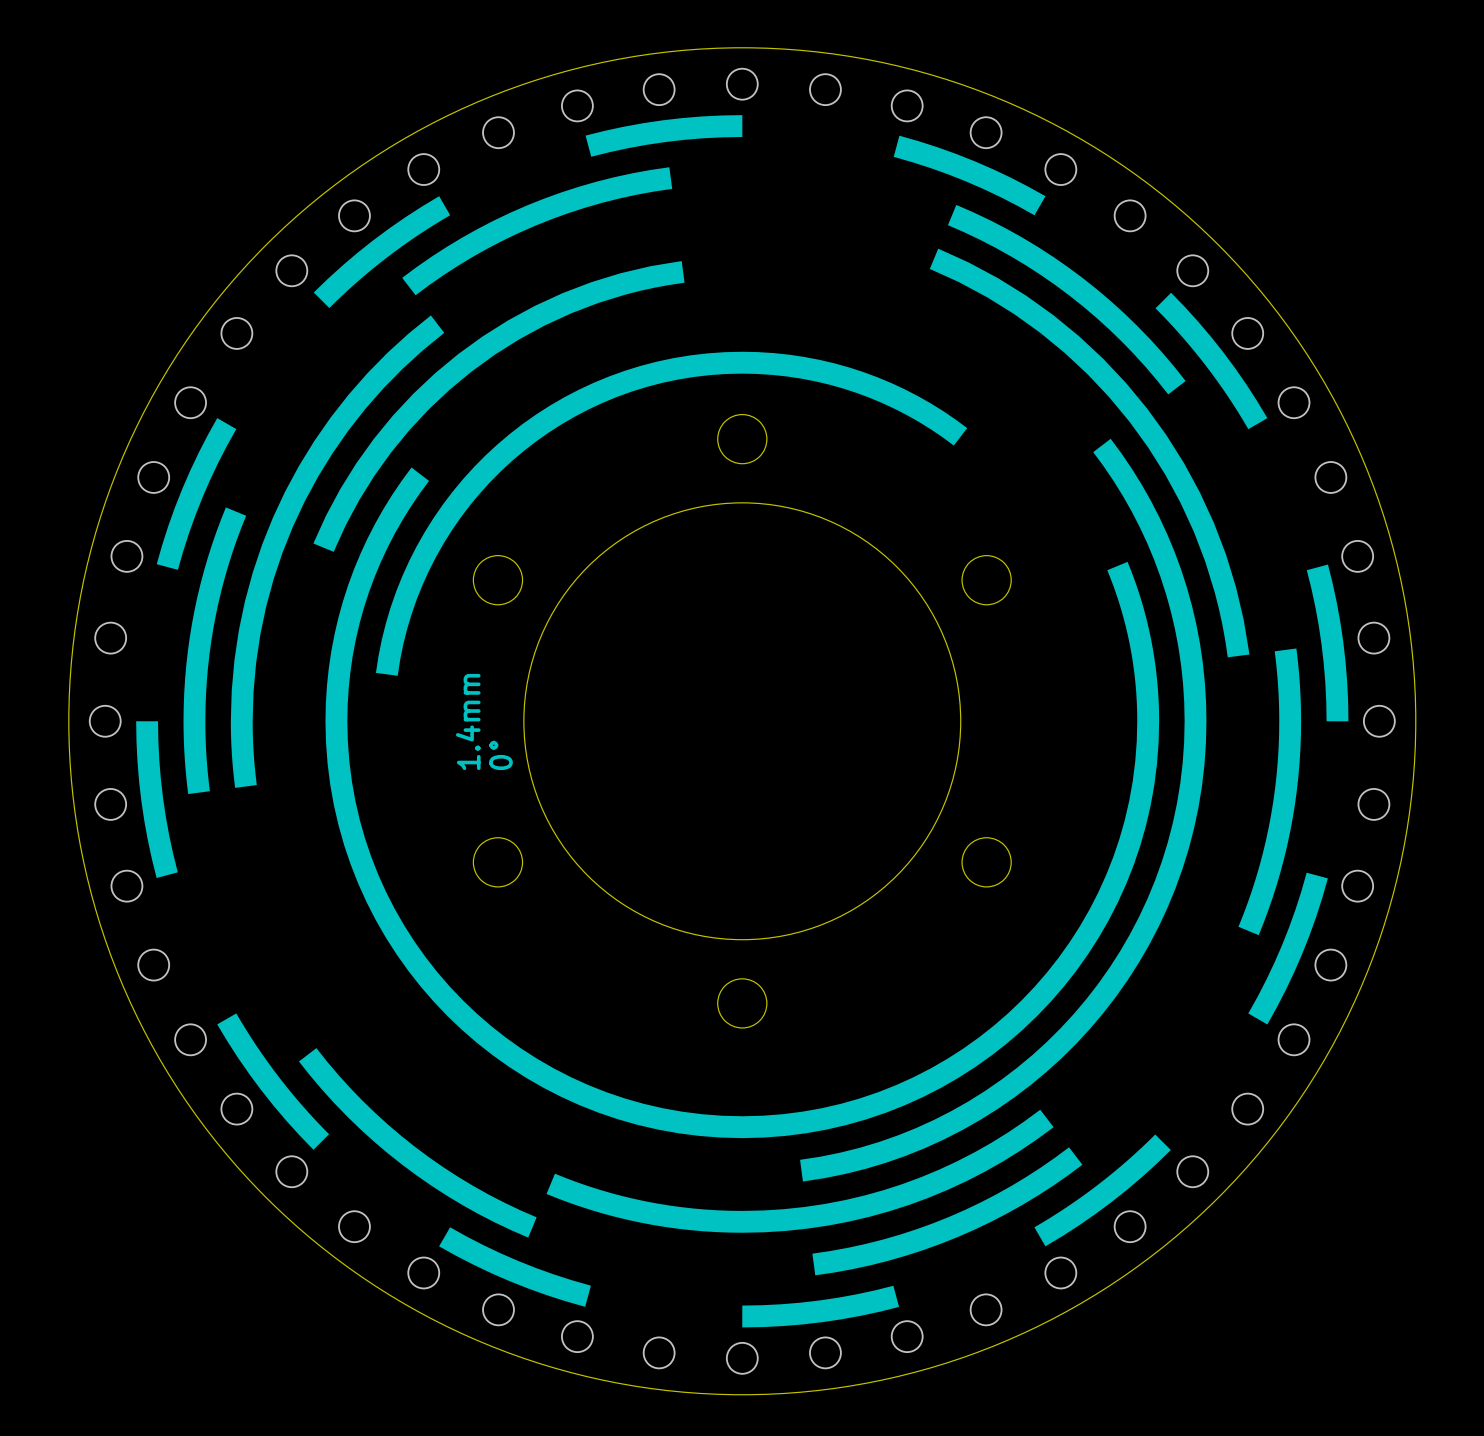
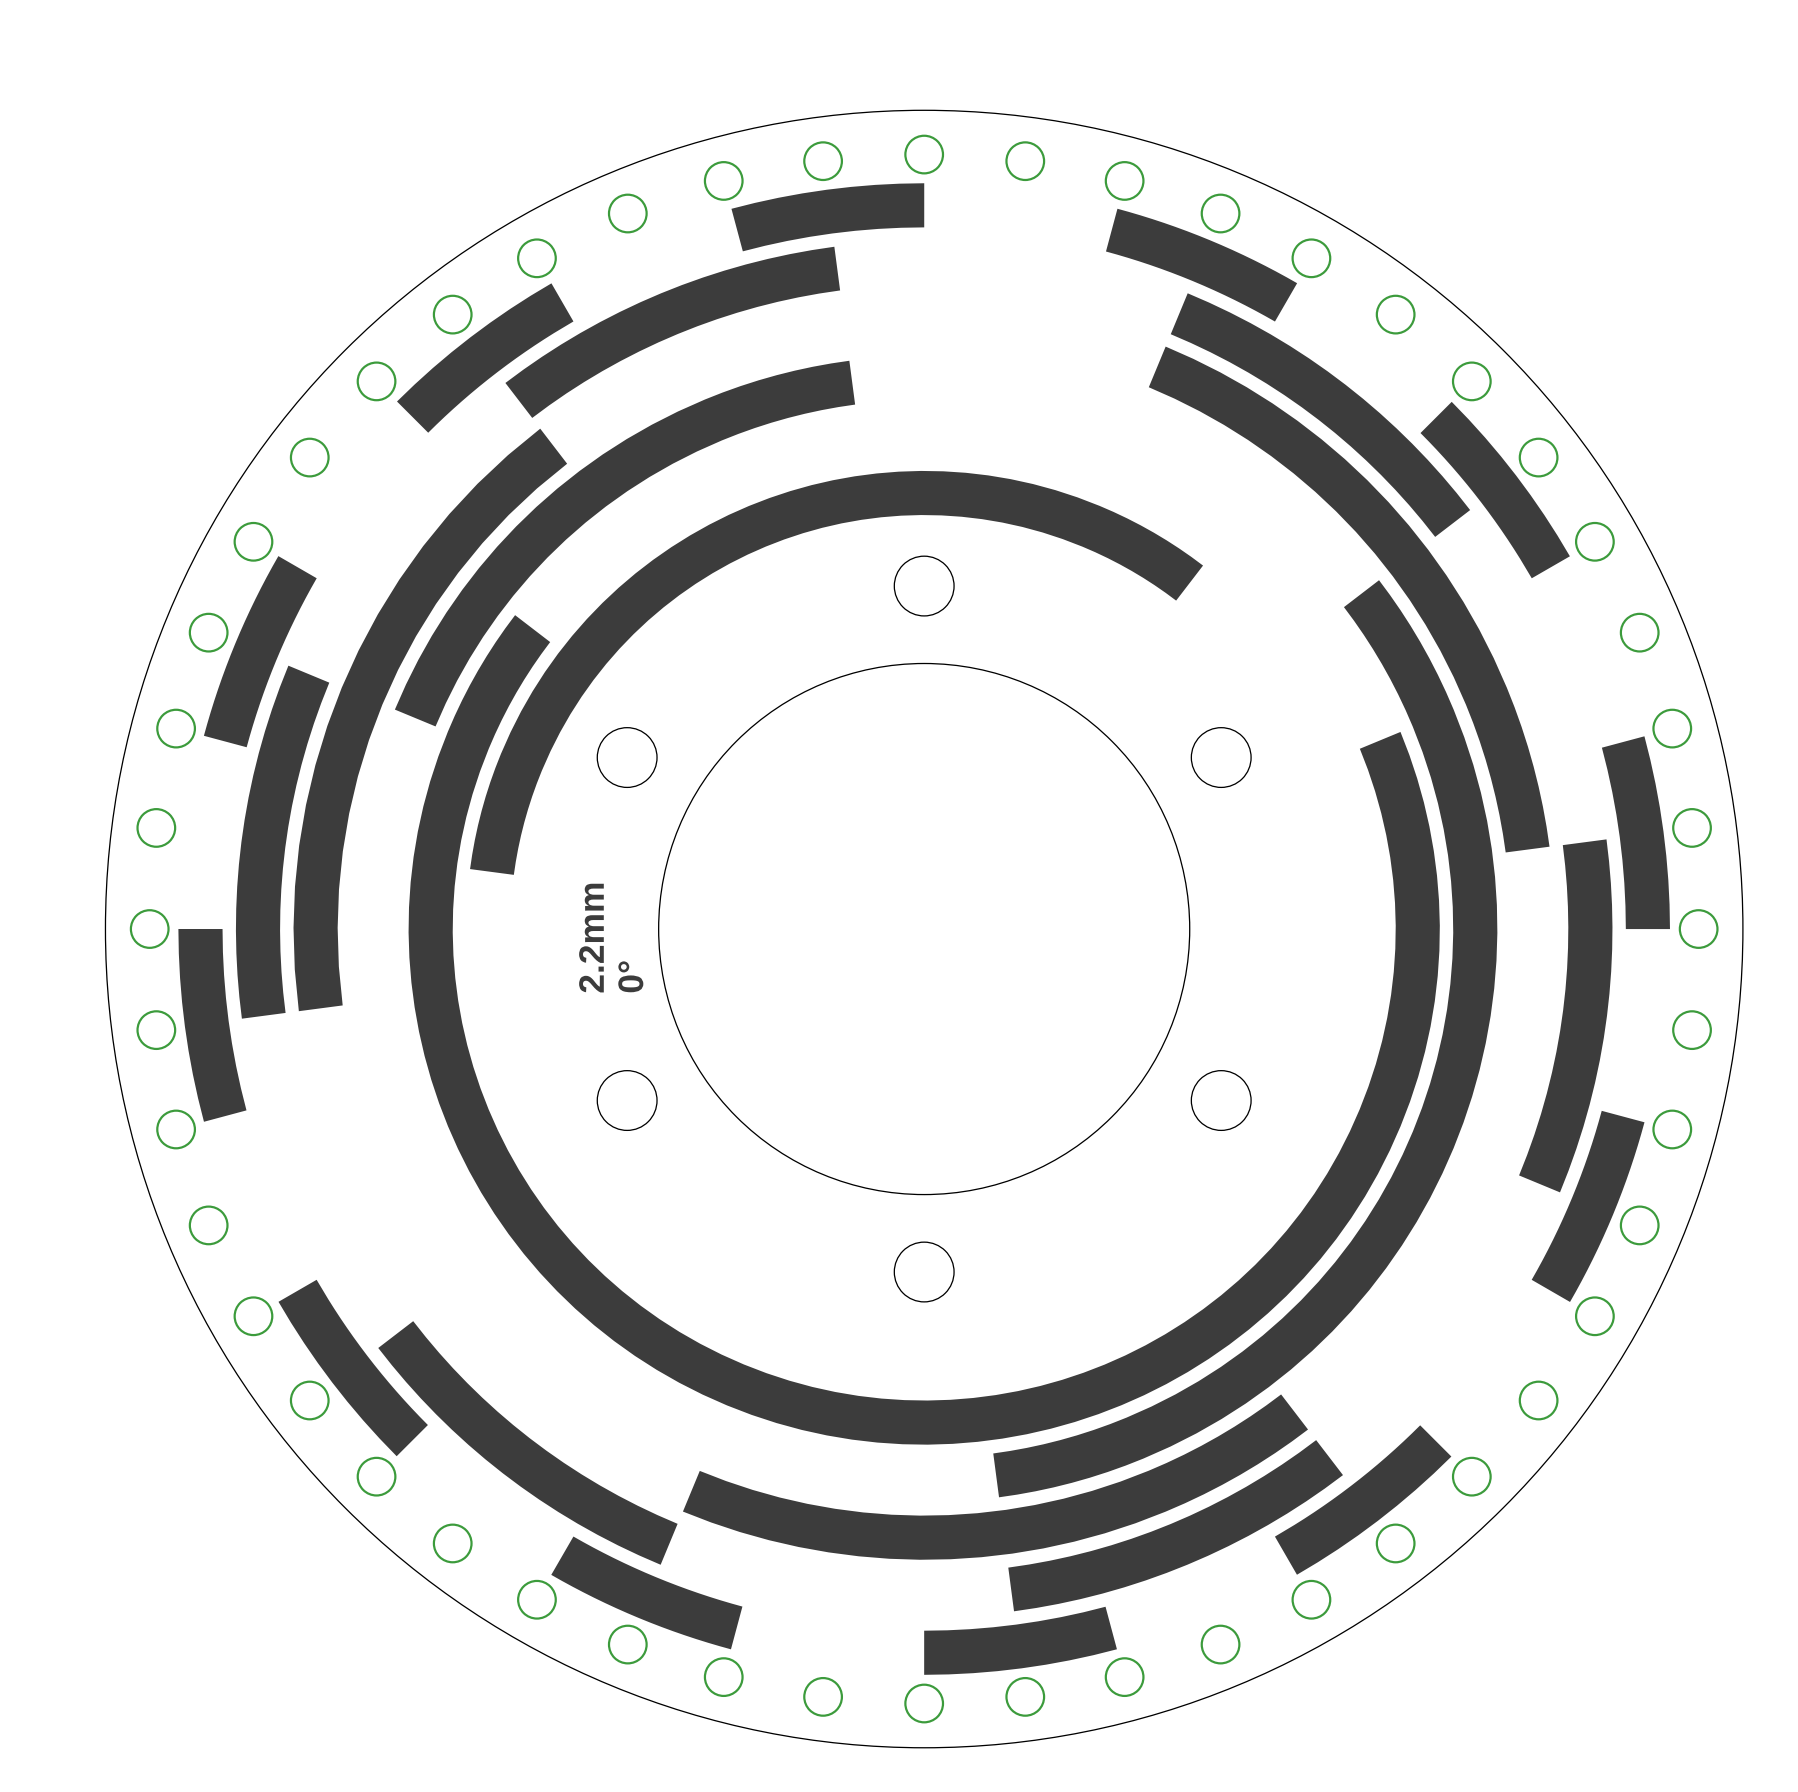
drawing shape: [136, 115, 1349, 1328] -> [178, 183, 1670, 1675]
text: 1.4mm (468, 721) -> 2.2mm (591, 938)

